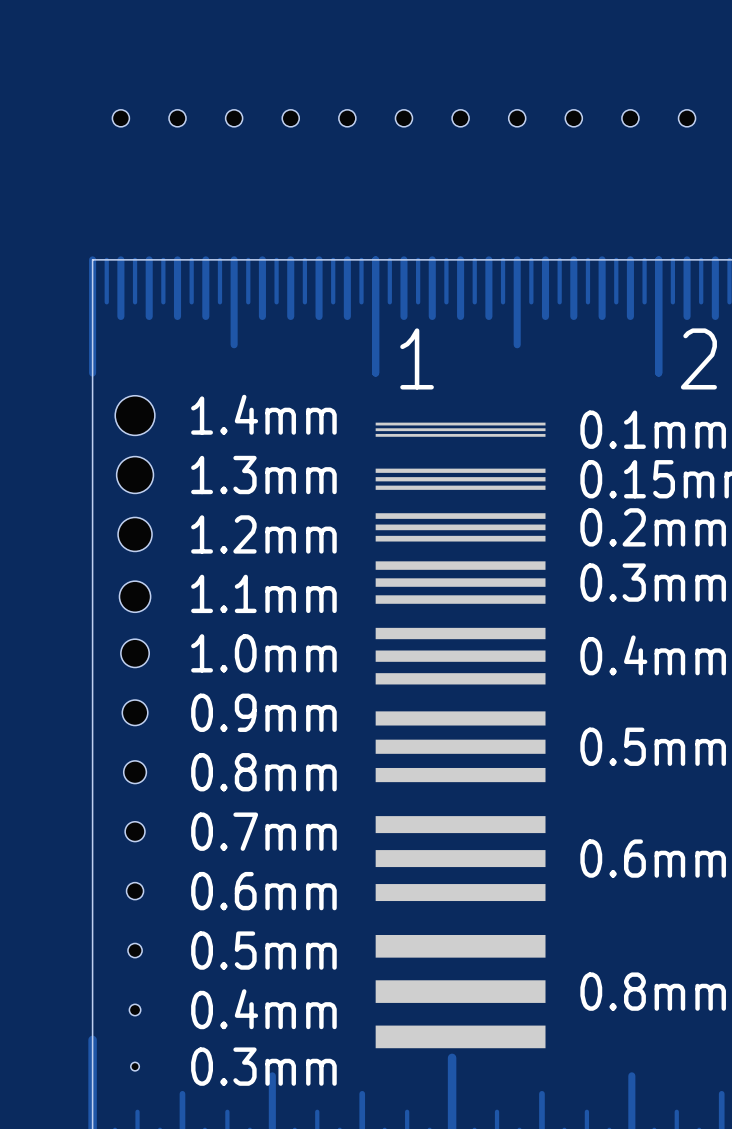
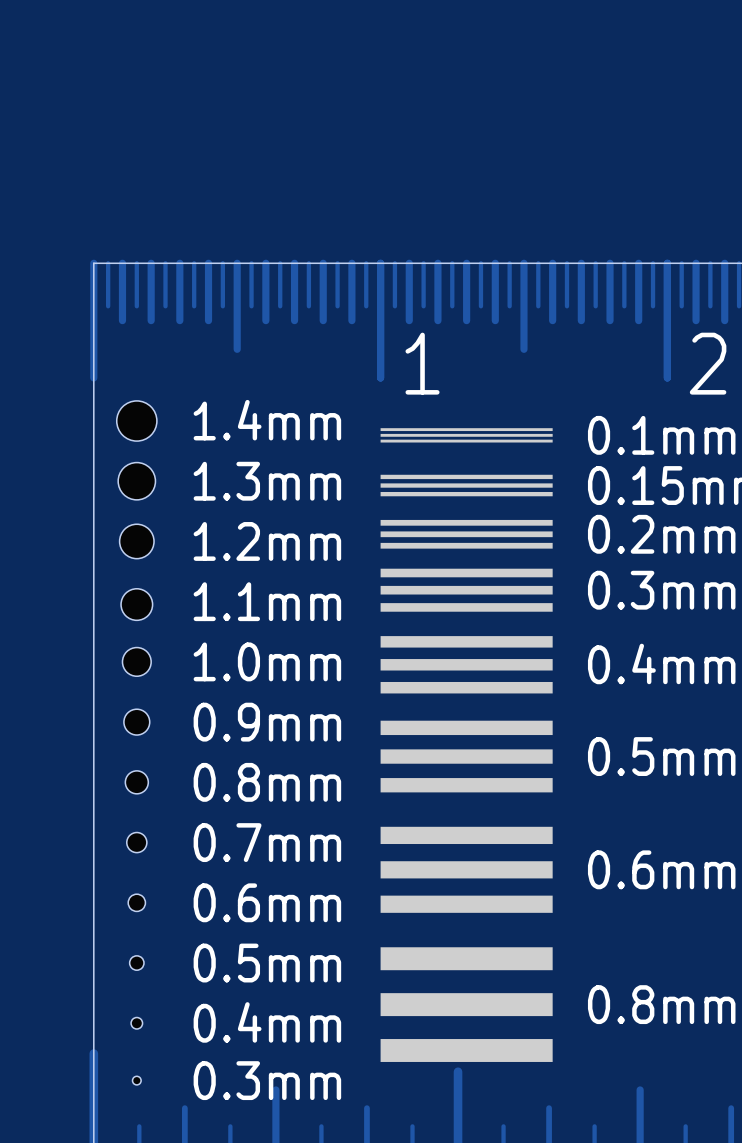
hole: (120, 118) -> none
hole: (177, 118) -> none
hole: (234, 118) -> none
hole: (290, 118) -> none
hole: (347, 118) -> none
hole: (403, 118) -> none
hole: (460, 118) -> none
hole: (517, 118) -> none
hole: (573, 118) -> none
hole: (630, 118) -> none
hole: (687, 118) -> none

